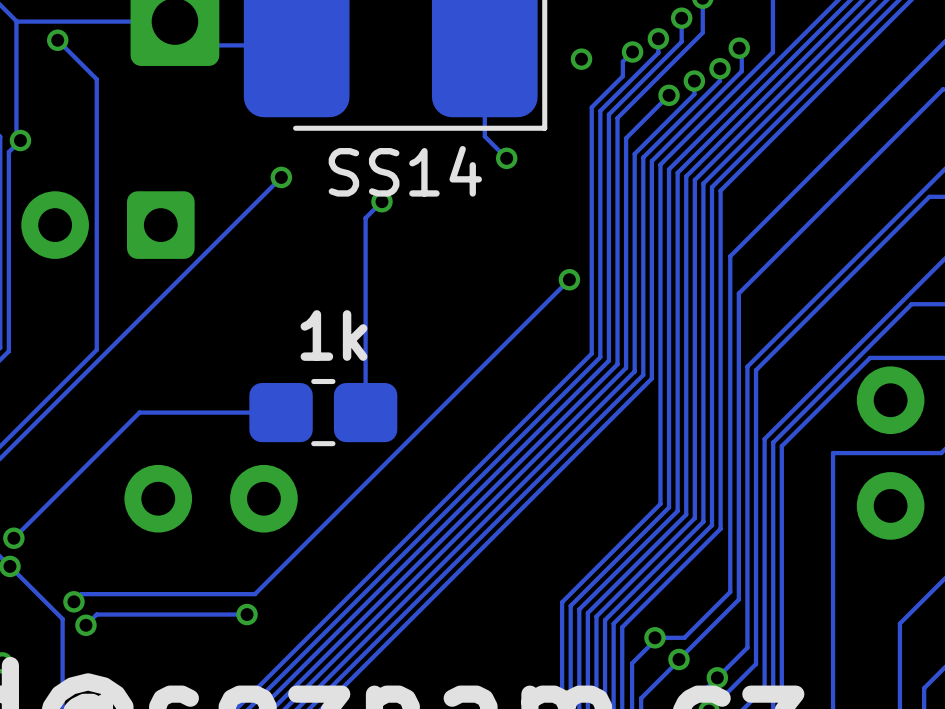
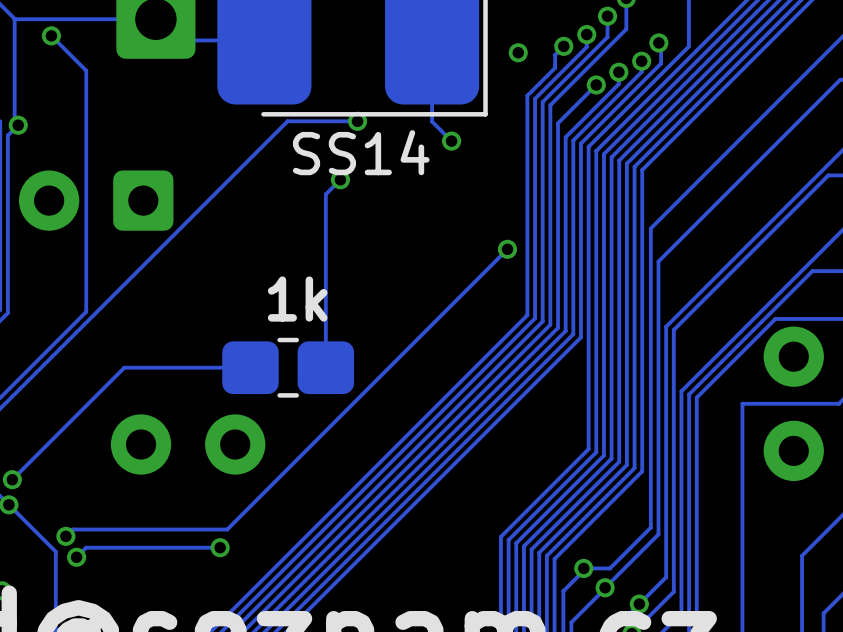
track: none -> (357, 121) (287, 121) (250, 158)
via position: (281, 177) -> (357, 121)

